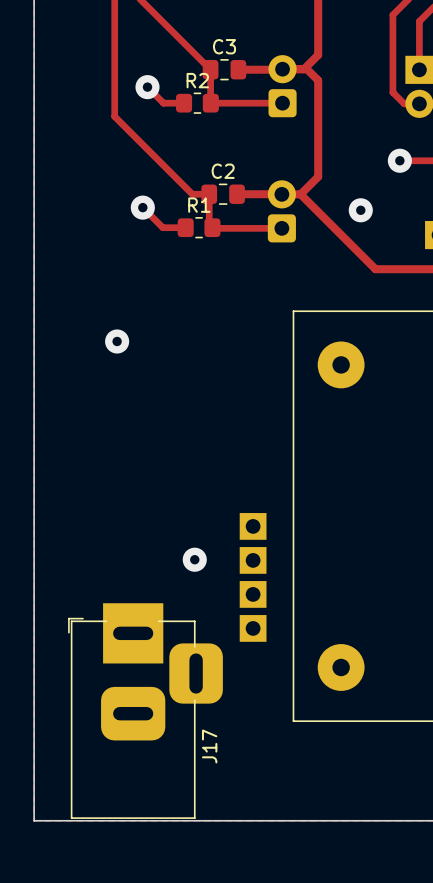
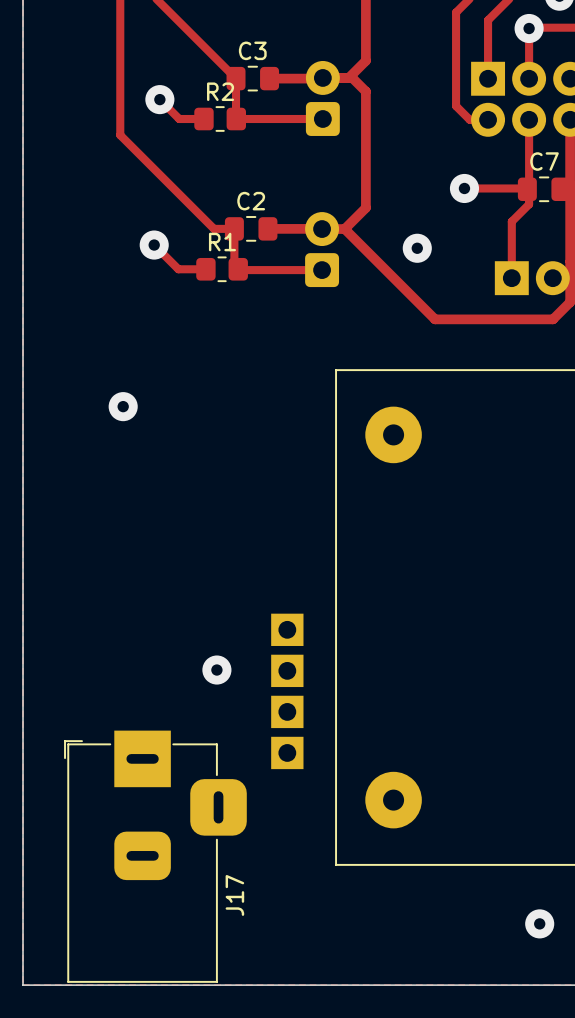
J17 footprint: [68, 603, 223, 819] -> [64, 730, 247, 983]

